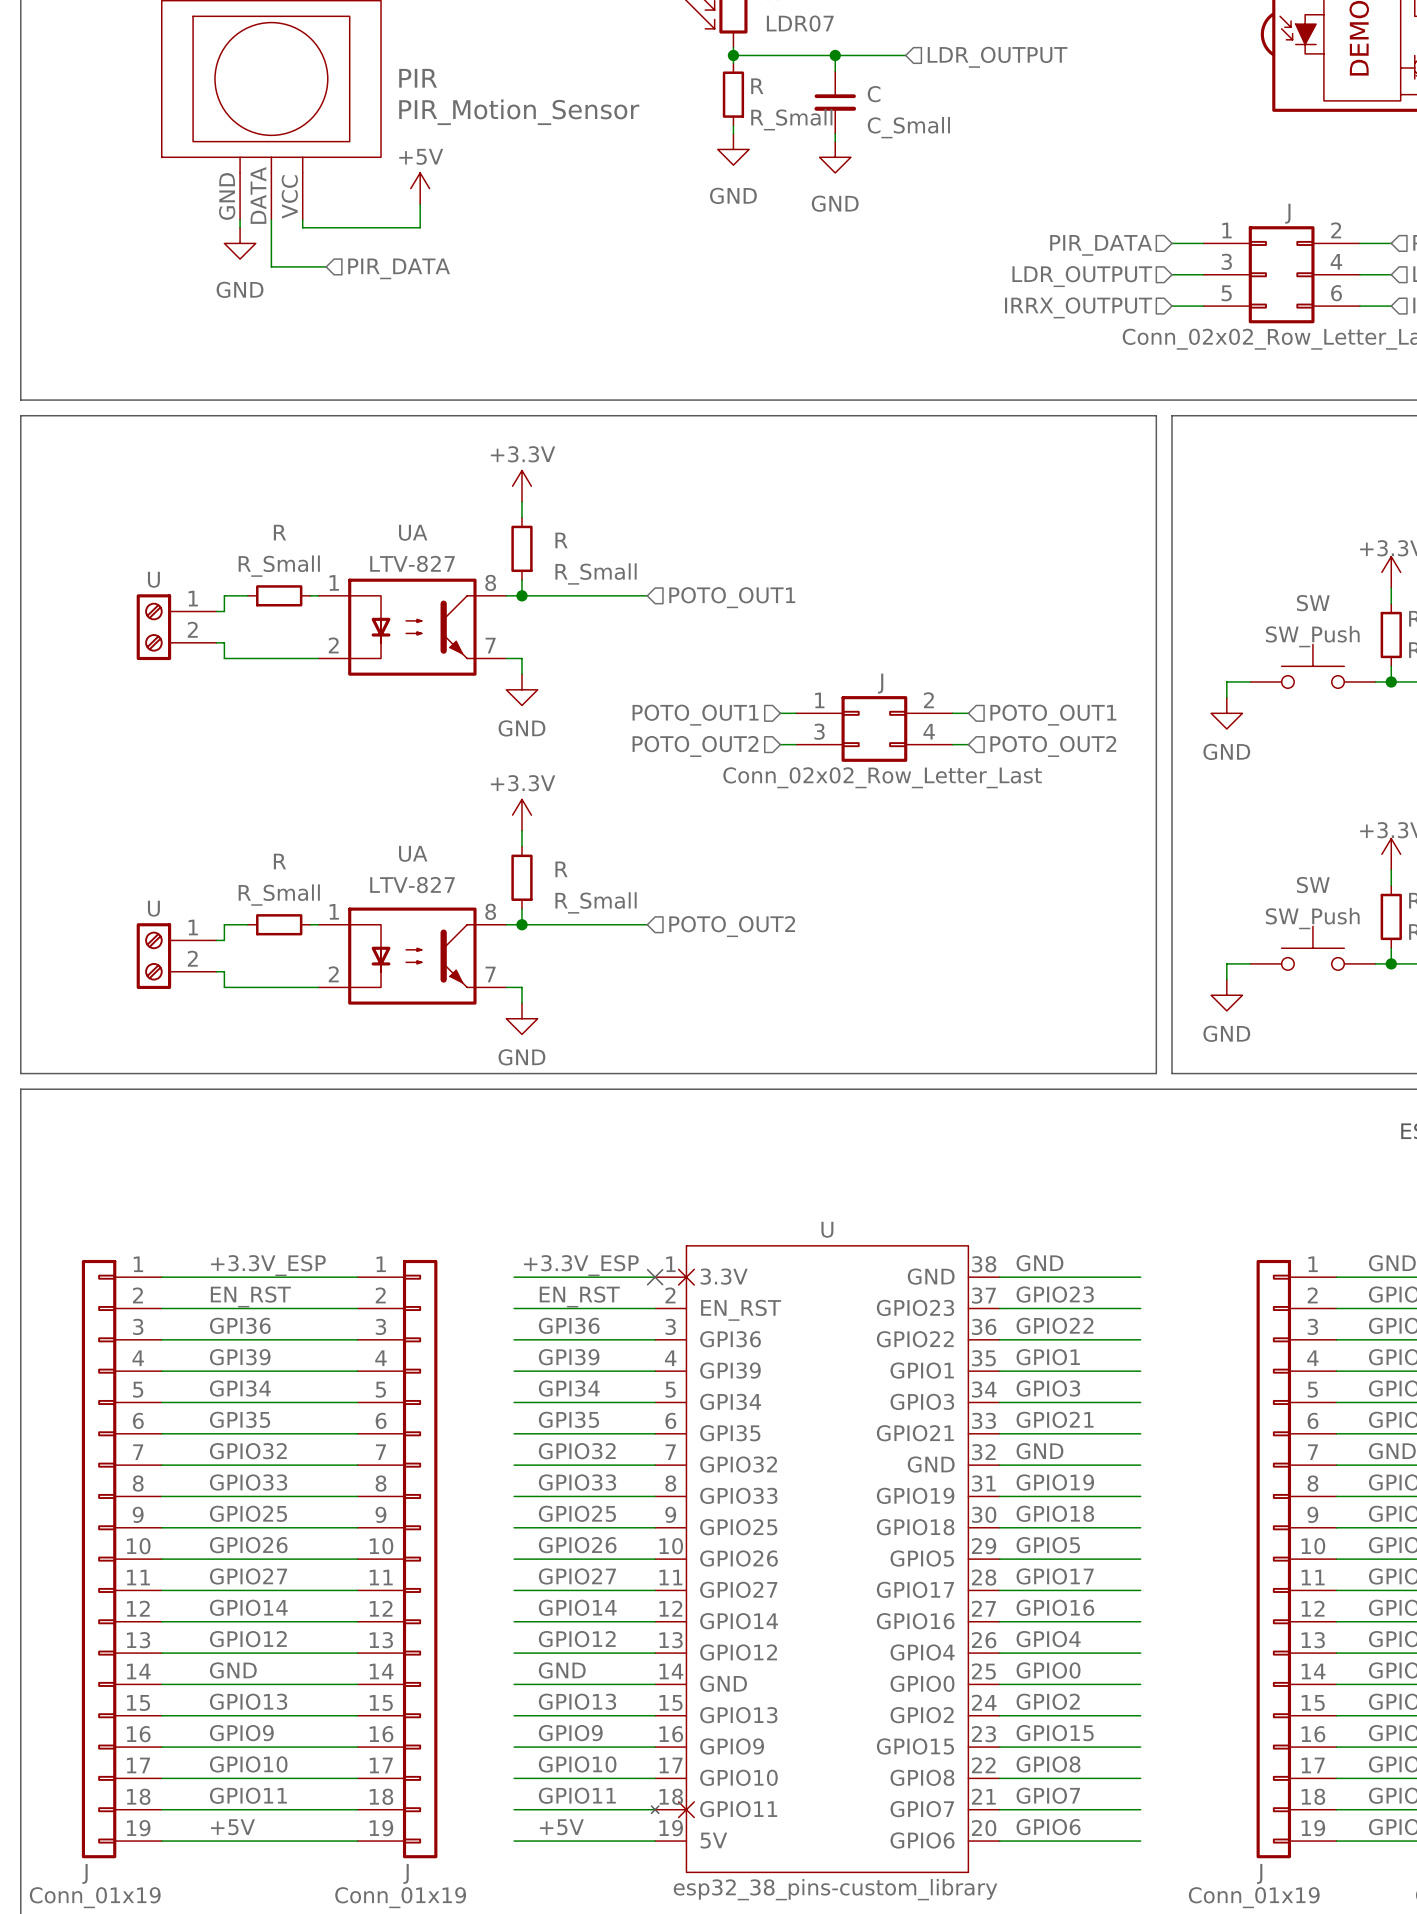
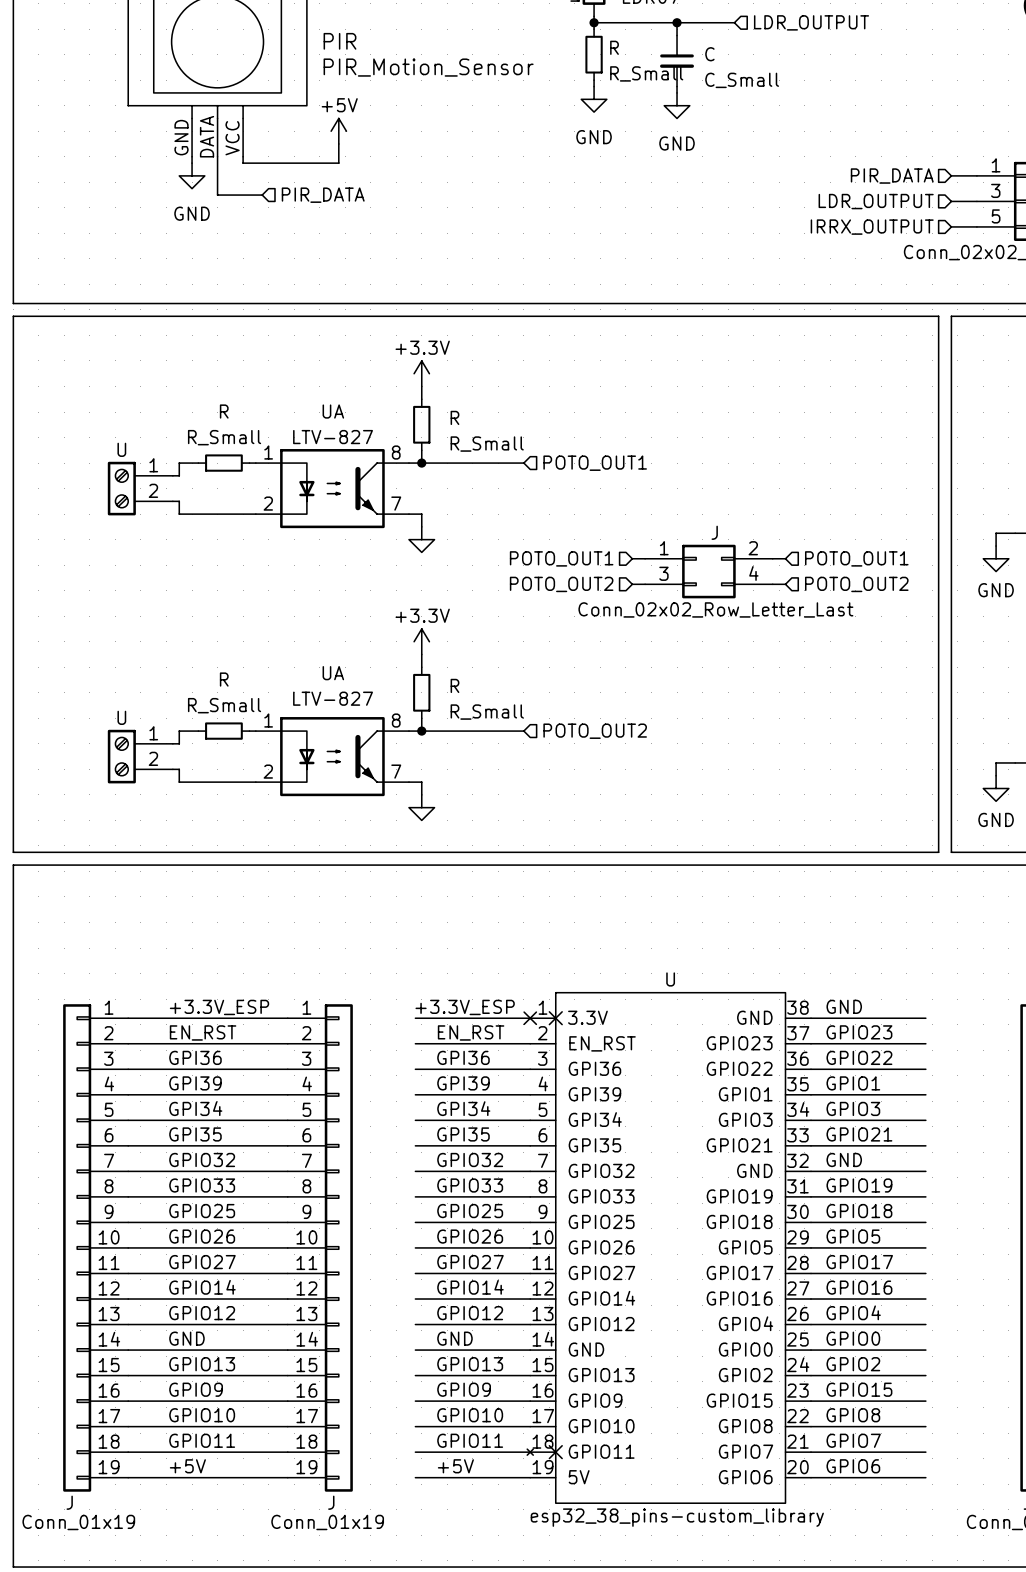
power symbol text: GND (521, 728) -> none
power symbol text: GND (521, 1057) -> none

